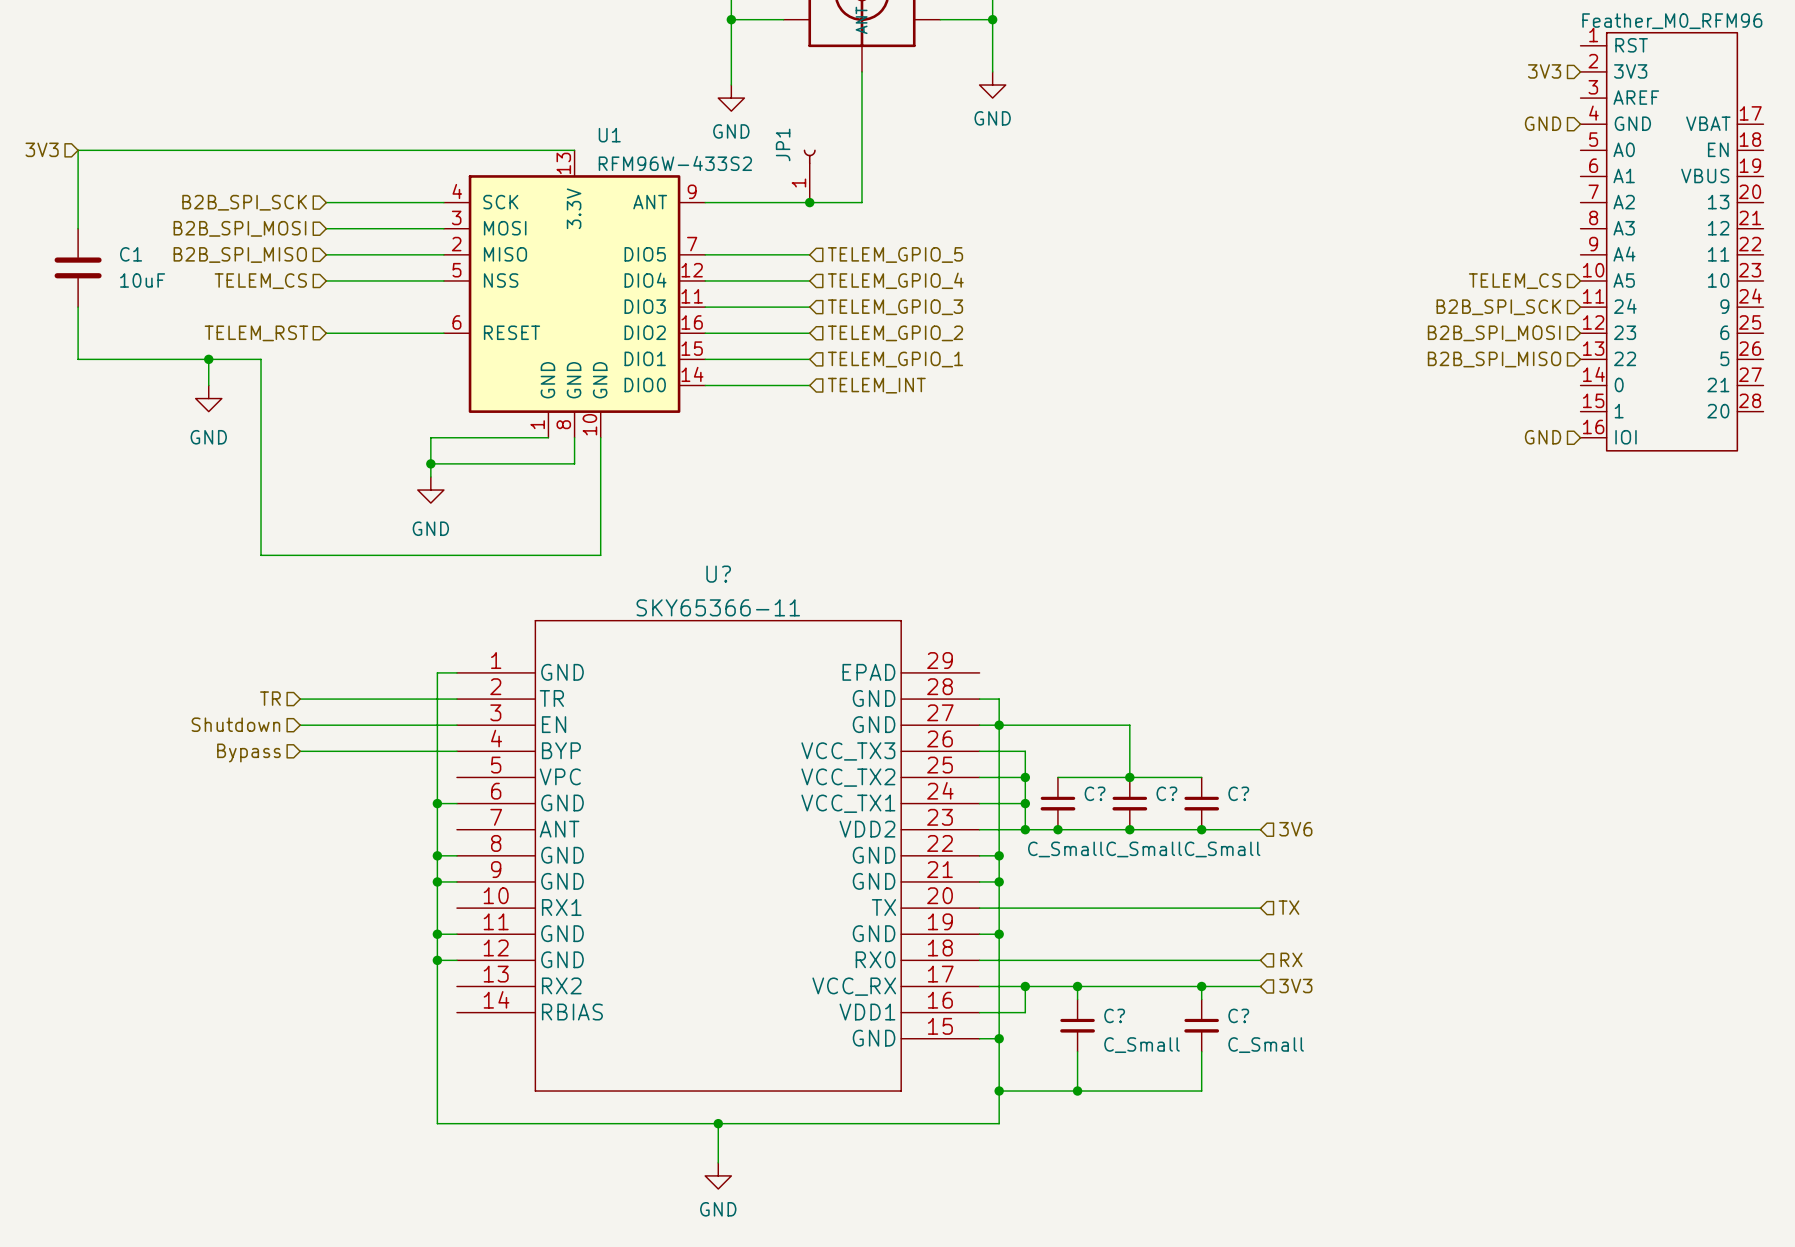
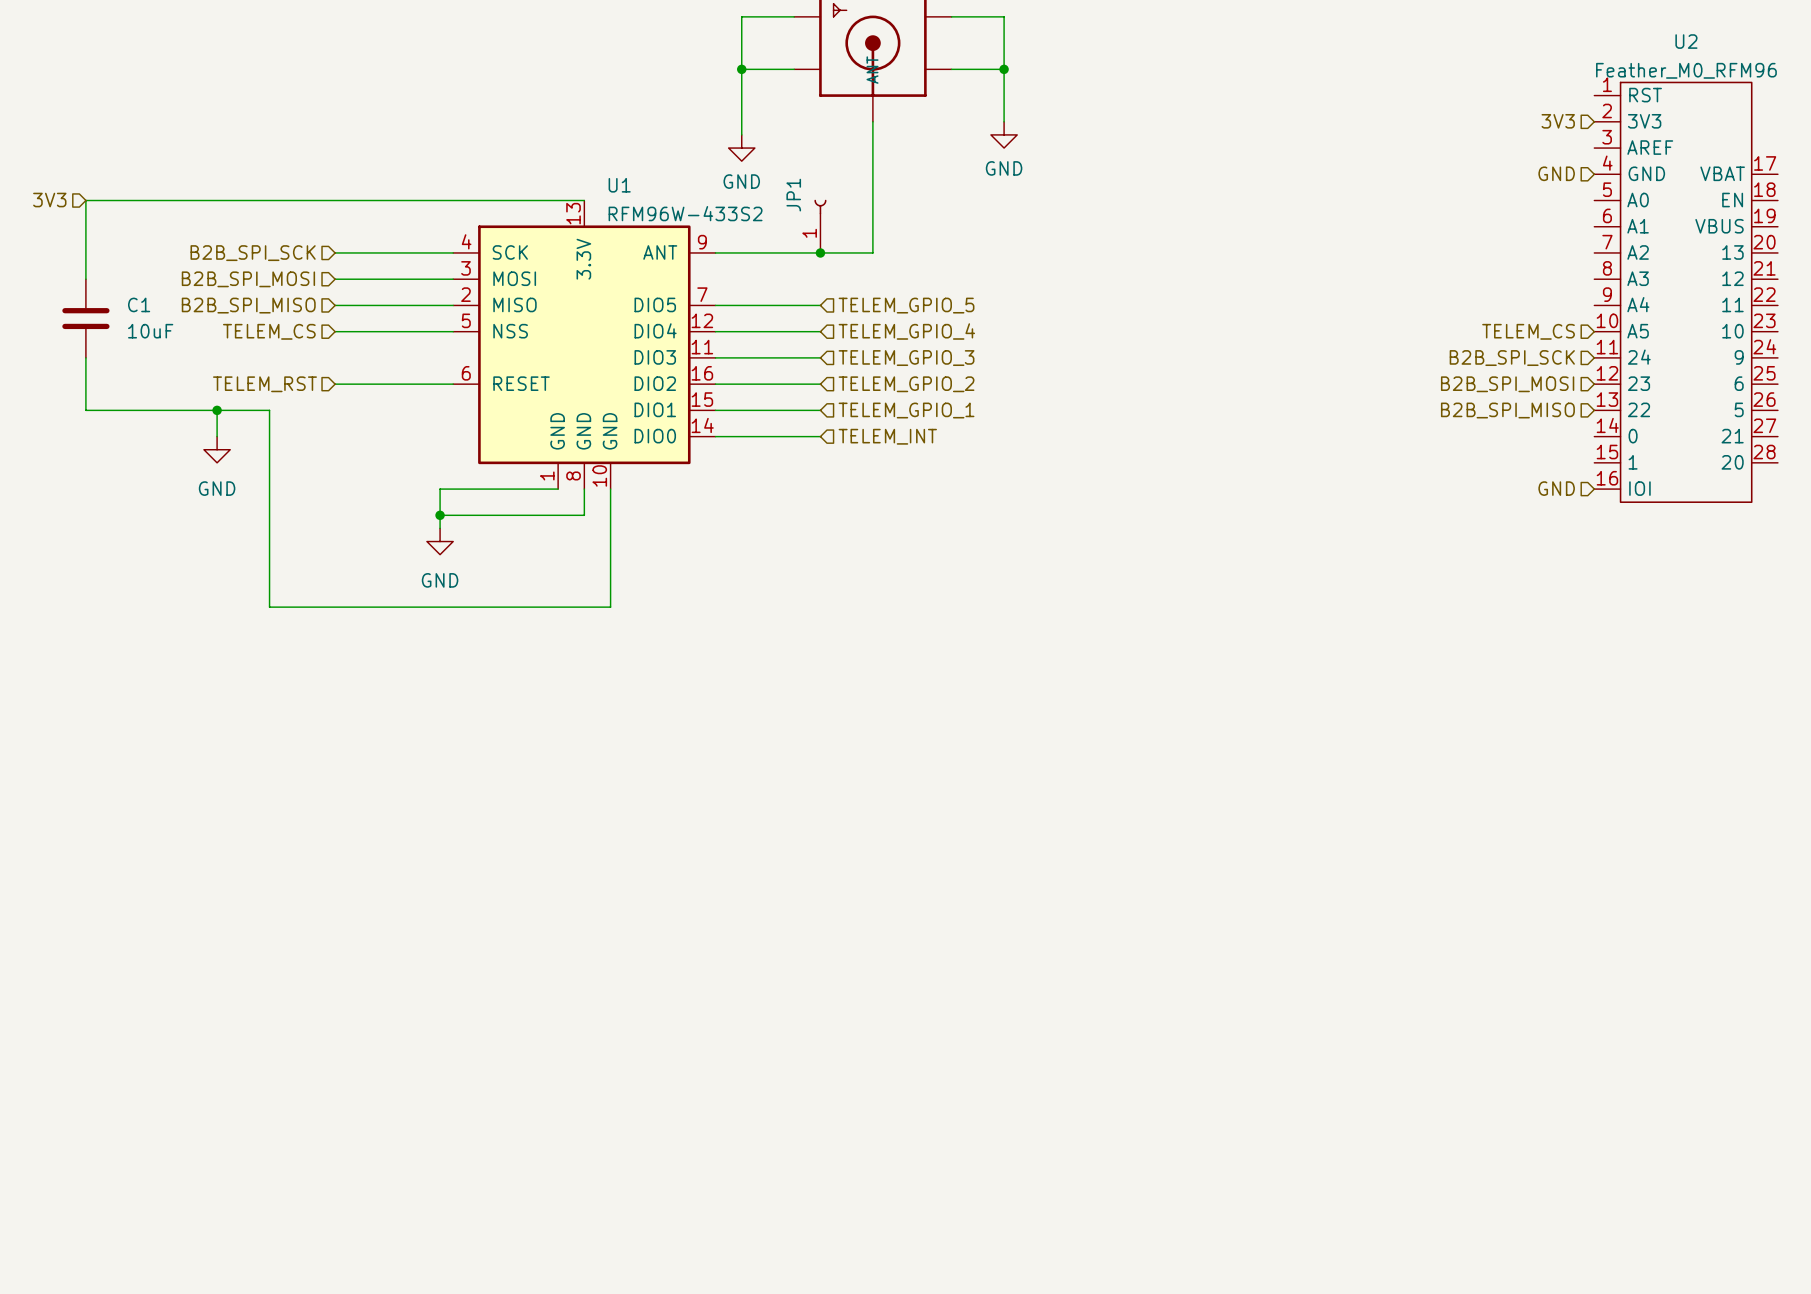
wire: (456, 672) (437, 672) (437, 1123) (999, 1123) (999, 699) (979, 699) -> none
hierarchical label: TR (270, 698) -> none
wire: (300, 699) (456, 699) -> none
hierarchical label: Shutdown (235, 724) -> none
wire: (300, 725) (456, 725) -> none
wire: (979, 725) (1129, 725) (1129, 777) -> none
junction: (999, 725) -> none
wire: (300, 751) (456, 751) -> none
wire: (979, 751) (1025, 751) (1025, 829) -> none
hierarchical label: Bypass (248, 753) -> none
wire: (979, 777) (1025, 777) -> none
junction: (1025, 777) -> none
wire: (1057, 777) (1201, 777) -> none
junction: (1129, 777) -> none
wire: (437, 803) (456, 803) -> none
junction: (437, 803) -> none
wire: (979, 803) (1025, 803) -> none
junction: (1025, 803) -> none
C?: C_Small (1057, 803) -> none
C?: C_Small (1129, 803) -> none
C?: C_Small (1201, 803) -> none
wire: (979, 829) (1260, 829) -> none
junction: (1025, 829) -> none
junction: (1057, 829) -> none
junction: (1129, 829) -> none
junction: (1201, 829) -> none
hierarchical label: 3V6 (1295, 829) -> none
wire: (437, 855) (456, 855) -> none
junction: (437, 855) -> none
U?: SKY65366-11 (718, 855) -> none
wire: (979, 855) (999, 855) -> none
junction: (999, 855) -> none
wire: (437, 881) (456, 881) -> none
junction: (437, 881) -> none
wire: (979, 881) (999, 881) -> none
junction: (999, 881) -> none
hierarchical label: TX (1288, 907) -> none
wire: (979, 908) (1260, 908) -> none
wire: (437, 934) (456, 934) -> none
junction: (437, 934) -> none
wire: (979, 934) (999, 934) -> none
junction: (999, 934) -> none
hierarchical label: RX (1291, 959) -> none
wire: (437, 960) (456, 960) -> none
junction: (437, 960) -> none
wire: (979, 960) (1260, 960) -> none
wire: (979, 986) (1260, 986) -> none
wire: (1025, 986) (1025, 1012) (979, 1012) -> none
junction: (1025, 986) -> none
wire: (1077, 986) (1077, 999) -> none
junction: (1077, 986) -> none
wire: (1201, 986) (1201, 999) -> none
junction: (1201, 986) -> none
hierarchical label: 3V3 (1295, 986) -> none
C?: C_Small (1077, 1025) -> none
C?: C_Small (1201, 1025) -> none
wire: (979, 1038) (999, 1038) -> none
junction: (999, 1038) -> none
wire: (1077, 1051) (1077, 1091) -> none
wire: (1201, 1051) (1201, 1091) (999, 1091) -> none
junction: (999, 1091) -> none
junction: (1077, 1091) -> none
wire: (718, 1123) (718, 1162) -> none
junction: (718, 1123) -> none
power symbol: GND (718, 1175) -> none

